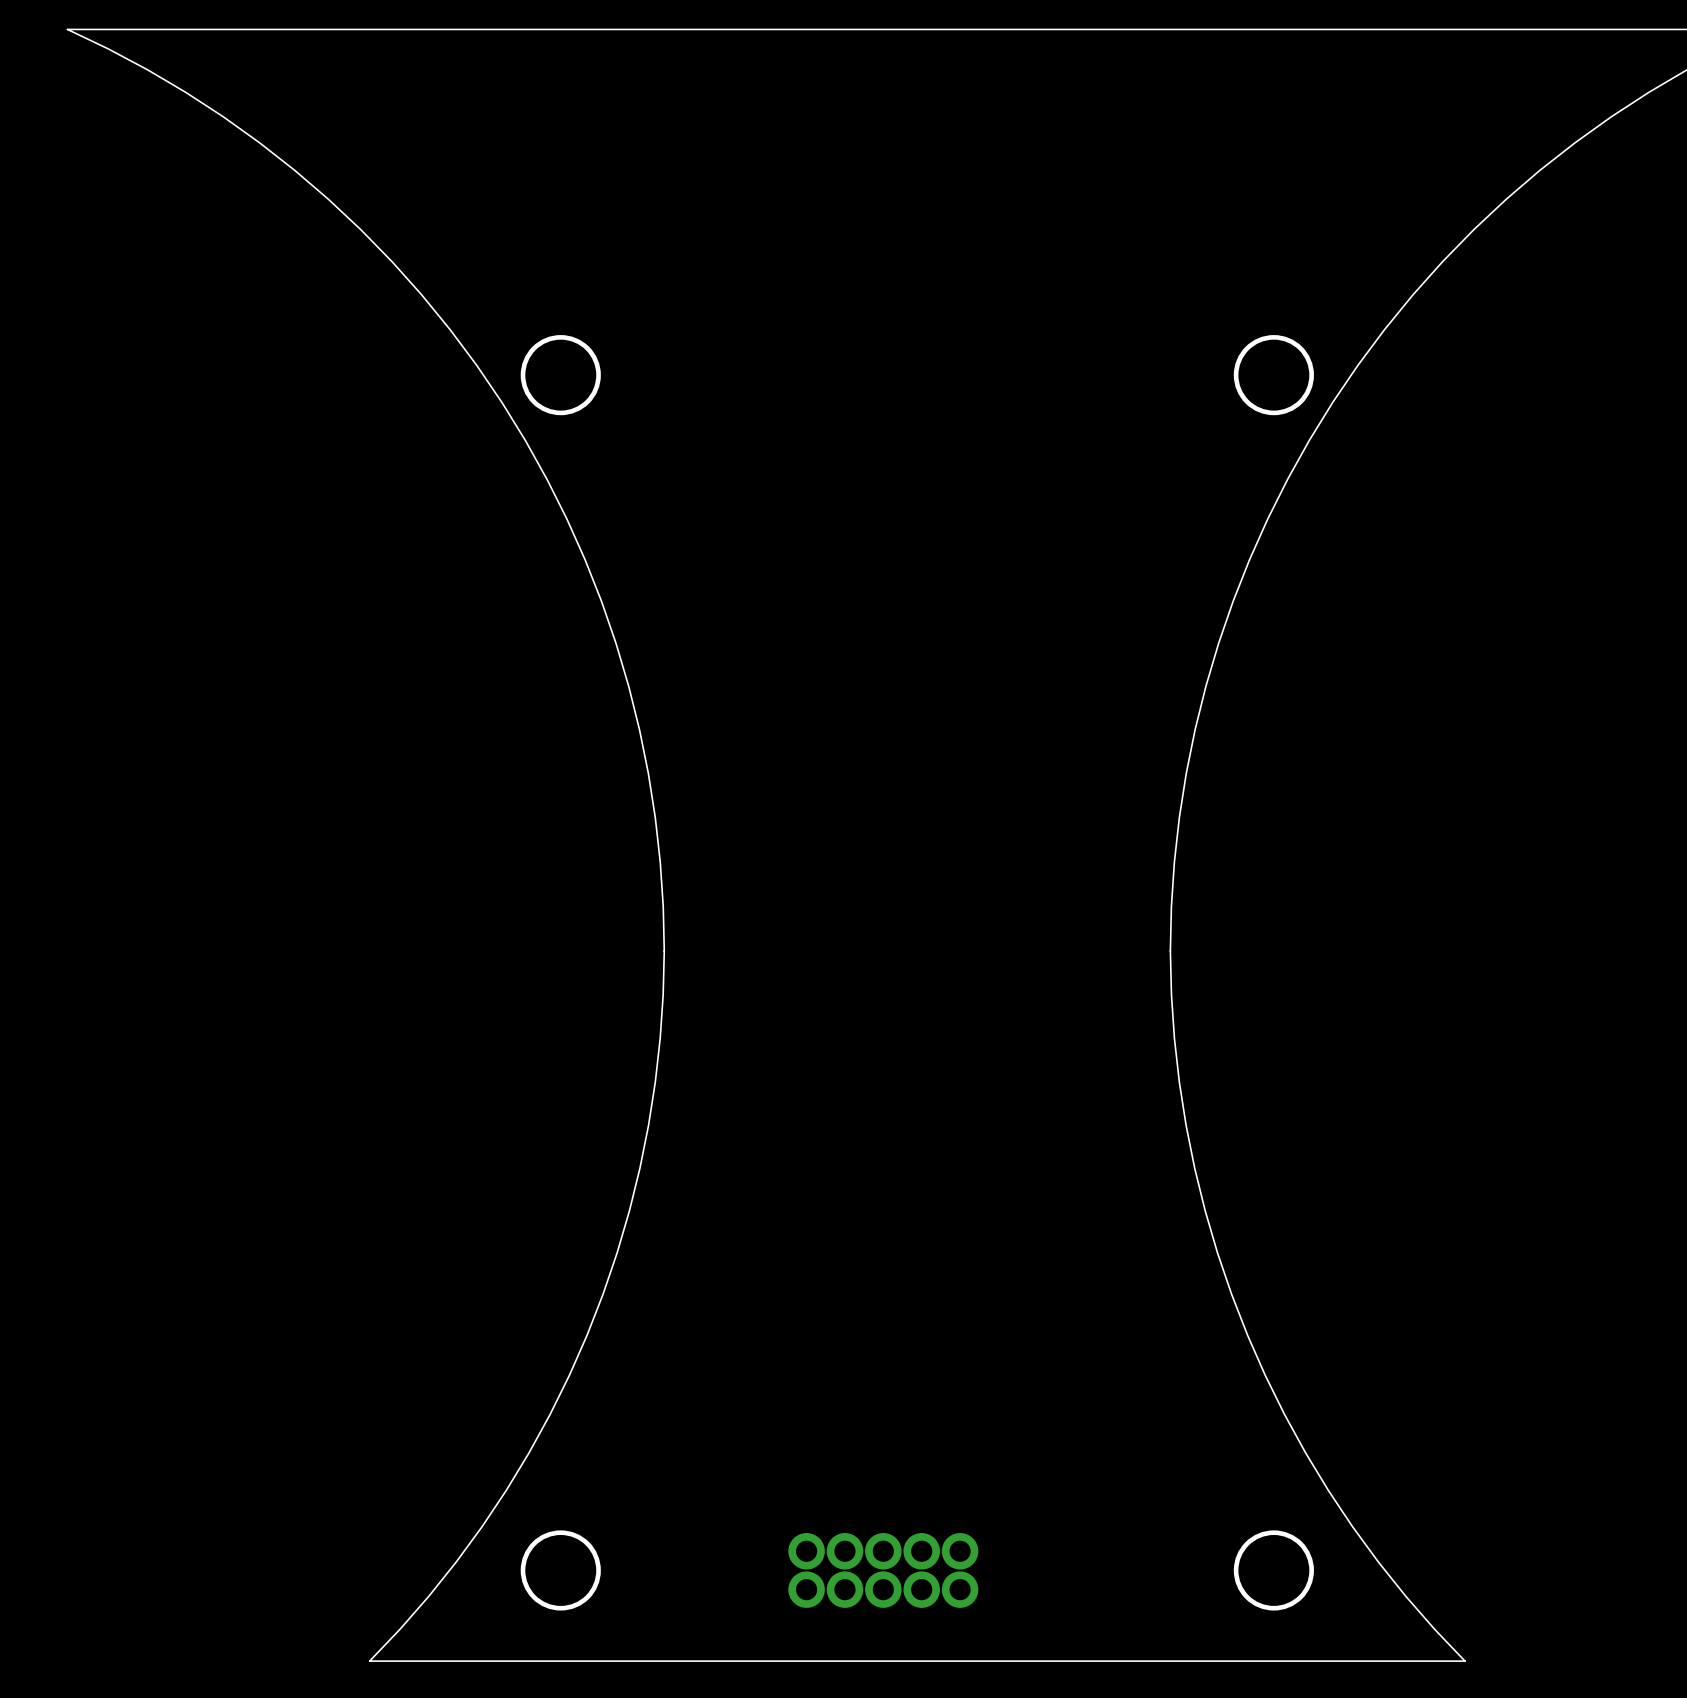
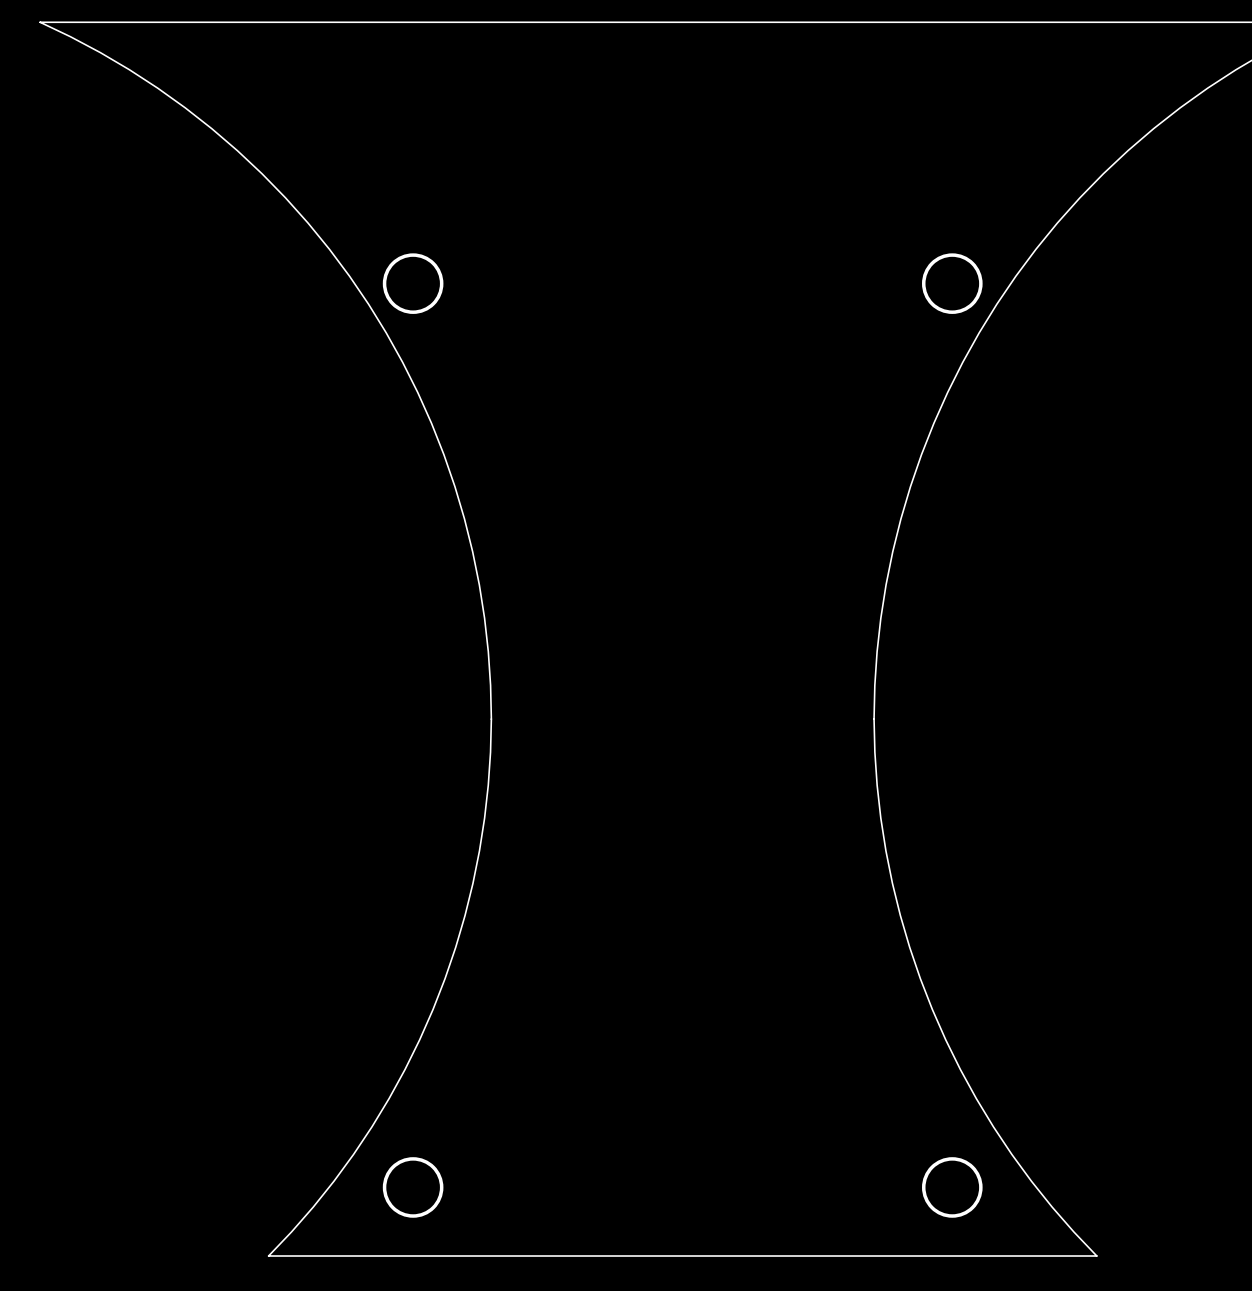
part: (883, 1570) -> none

